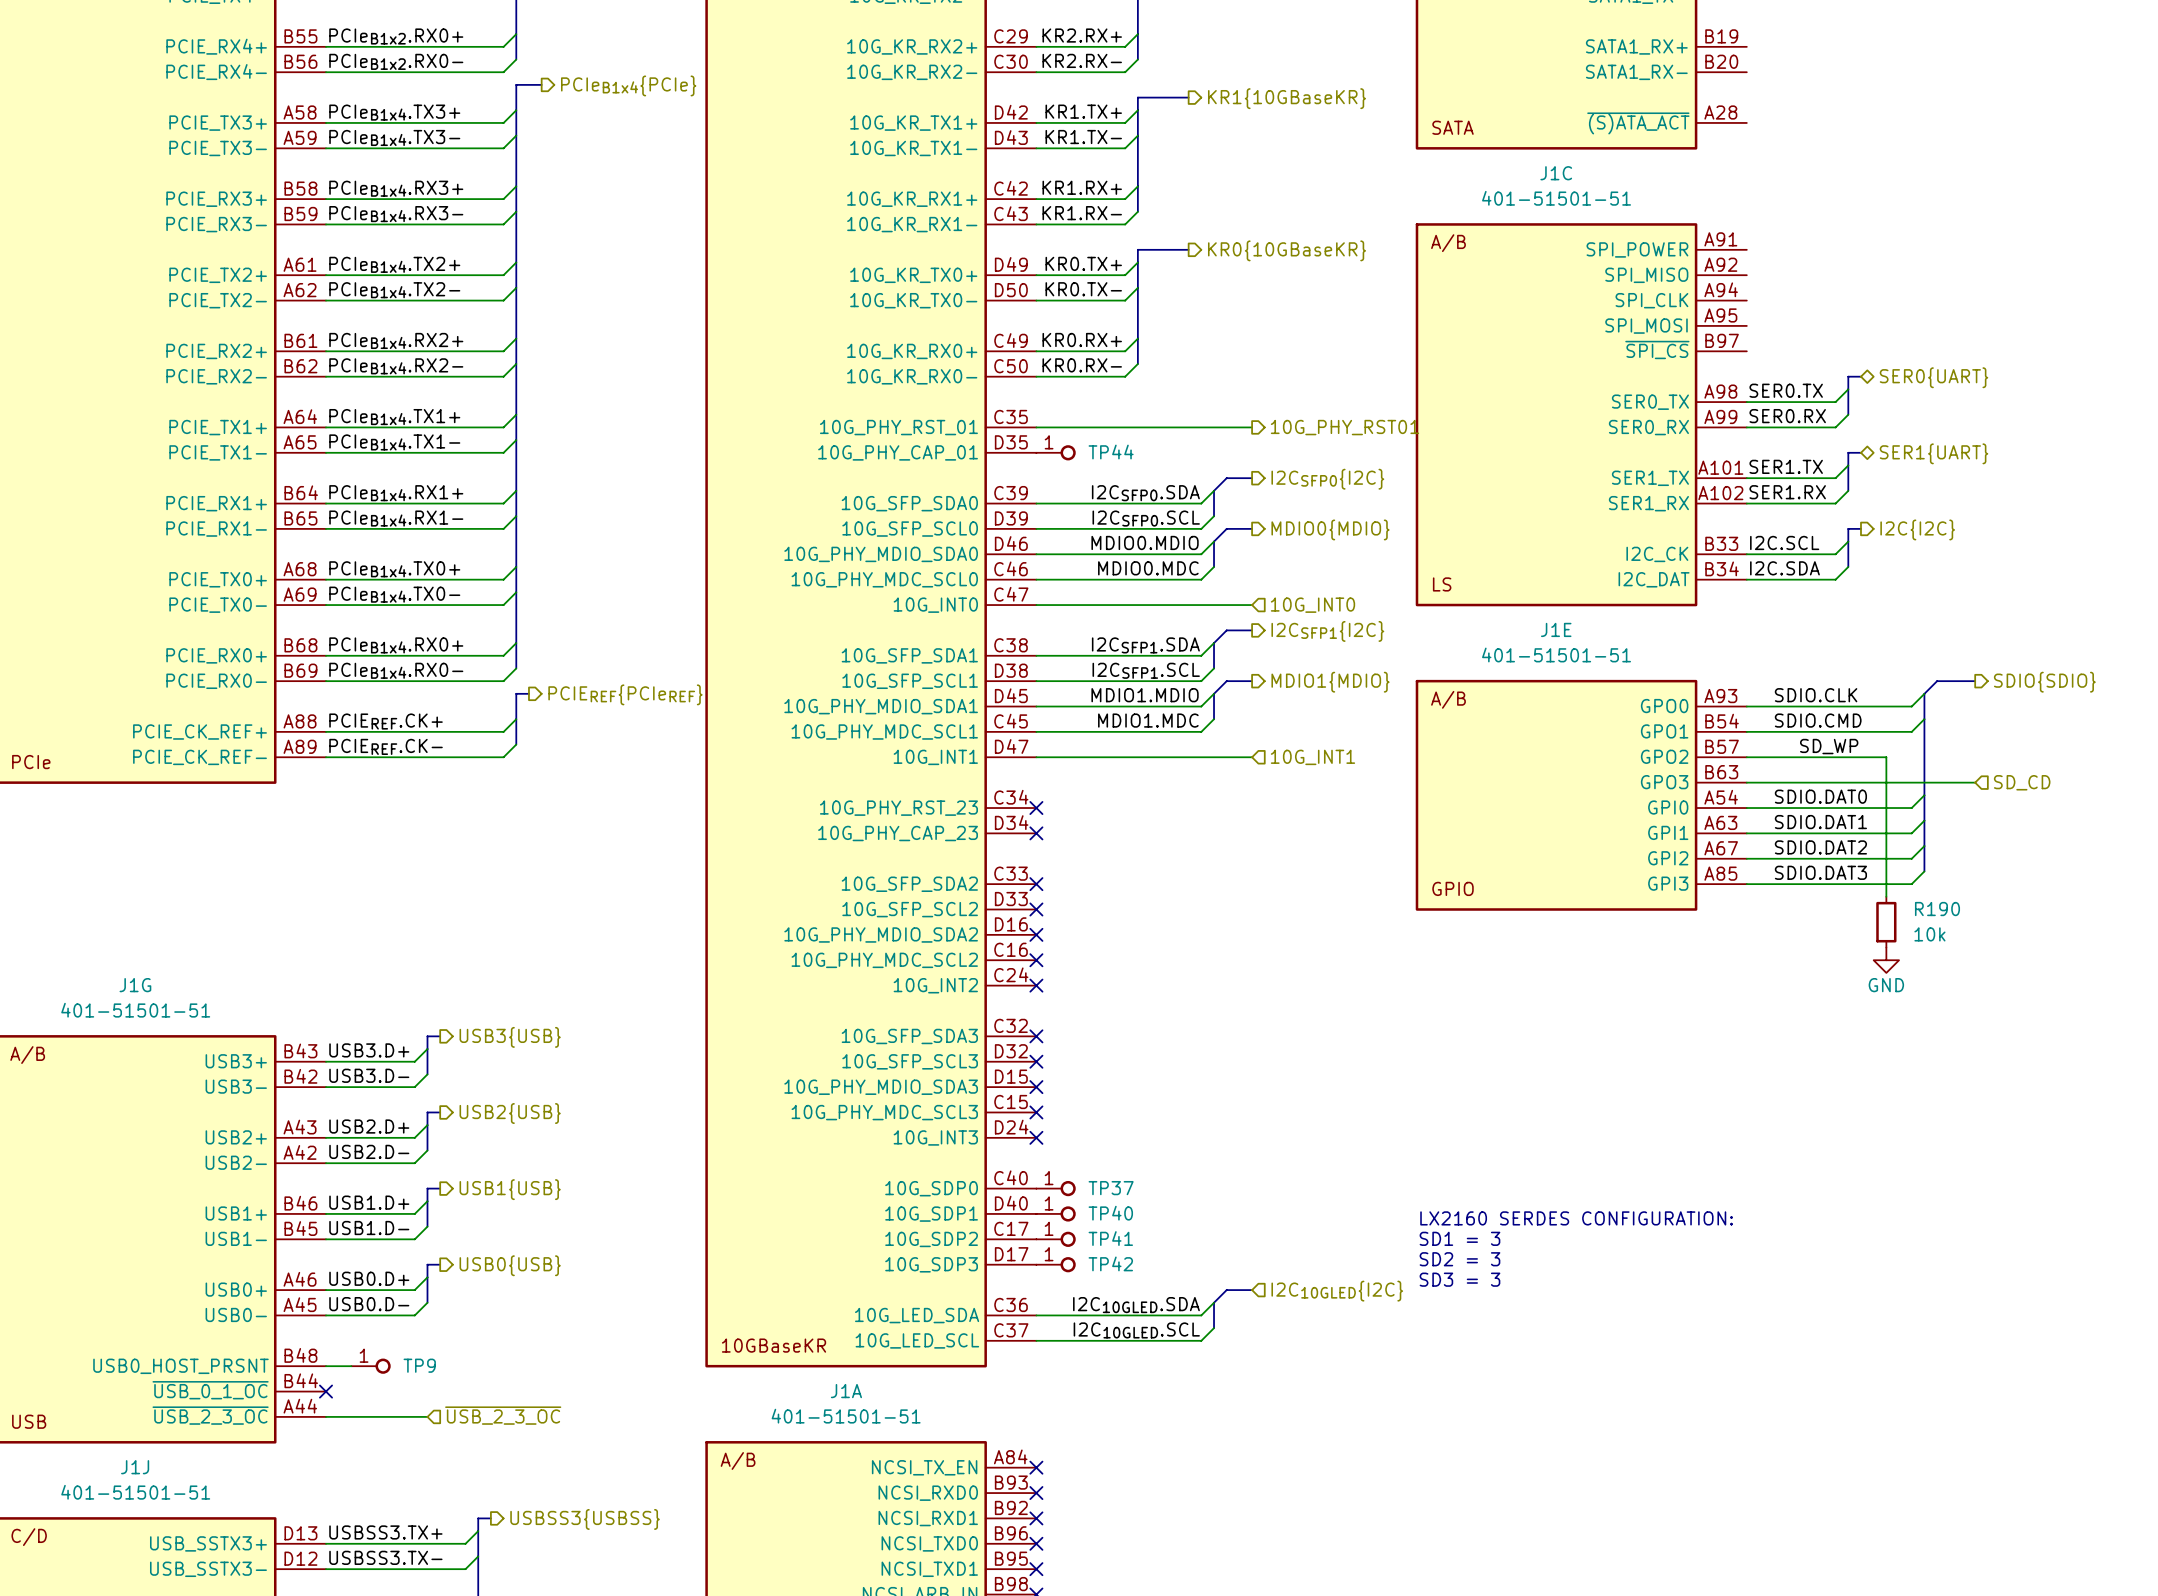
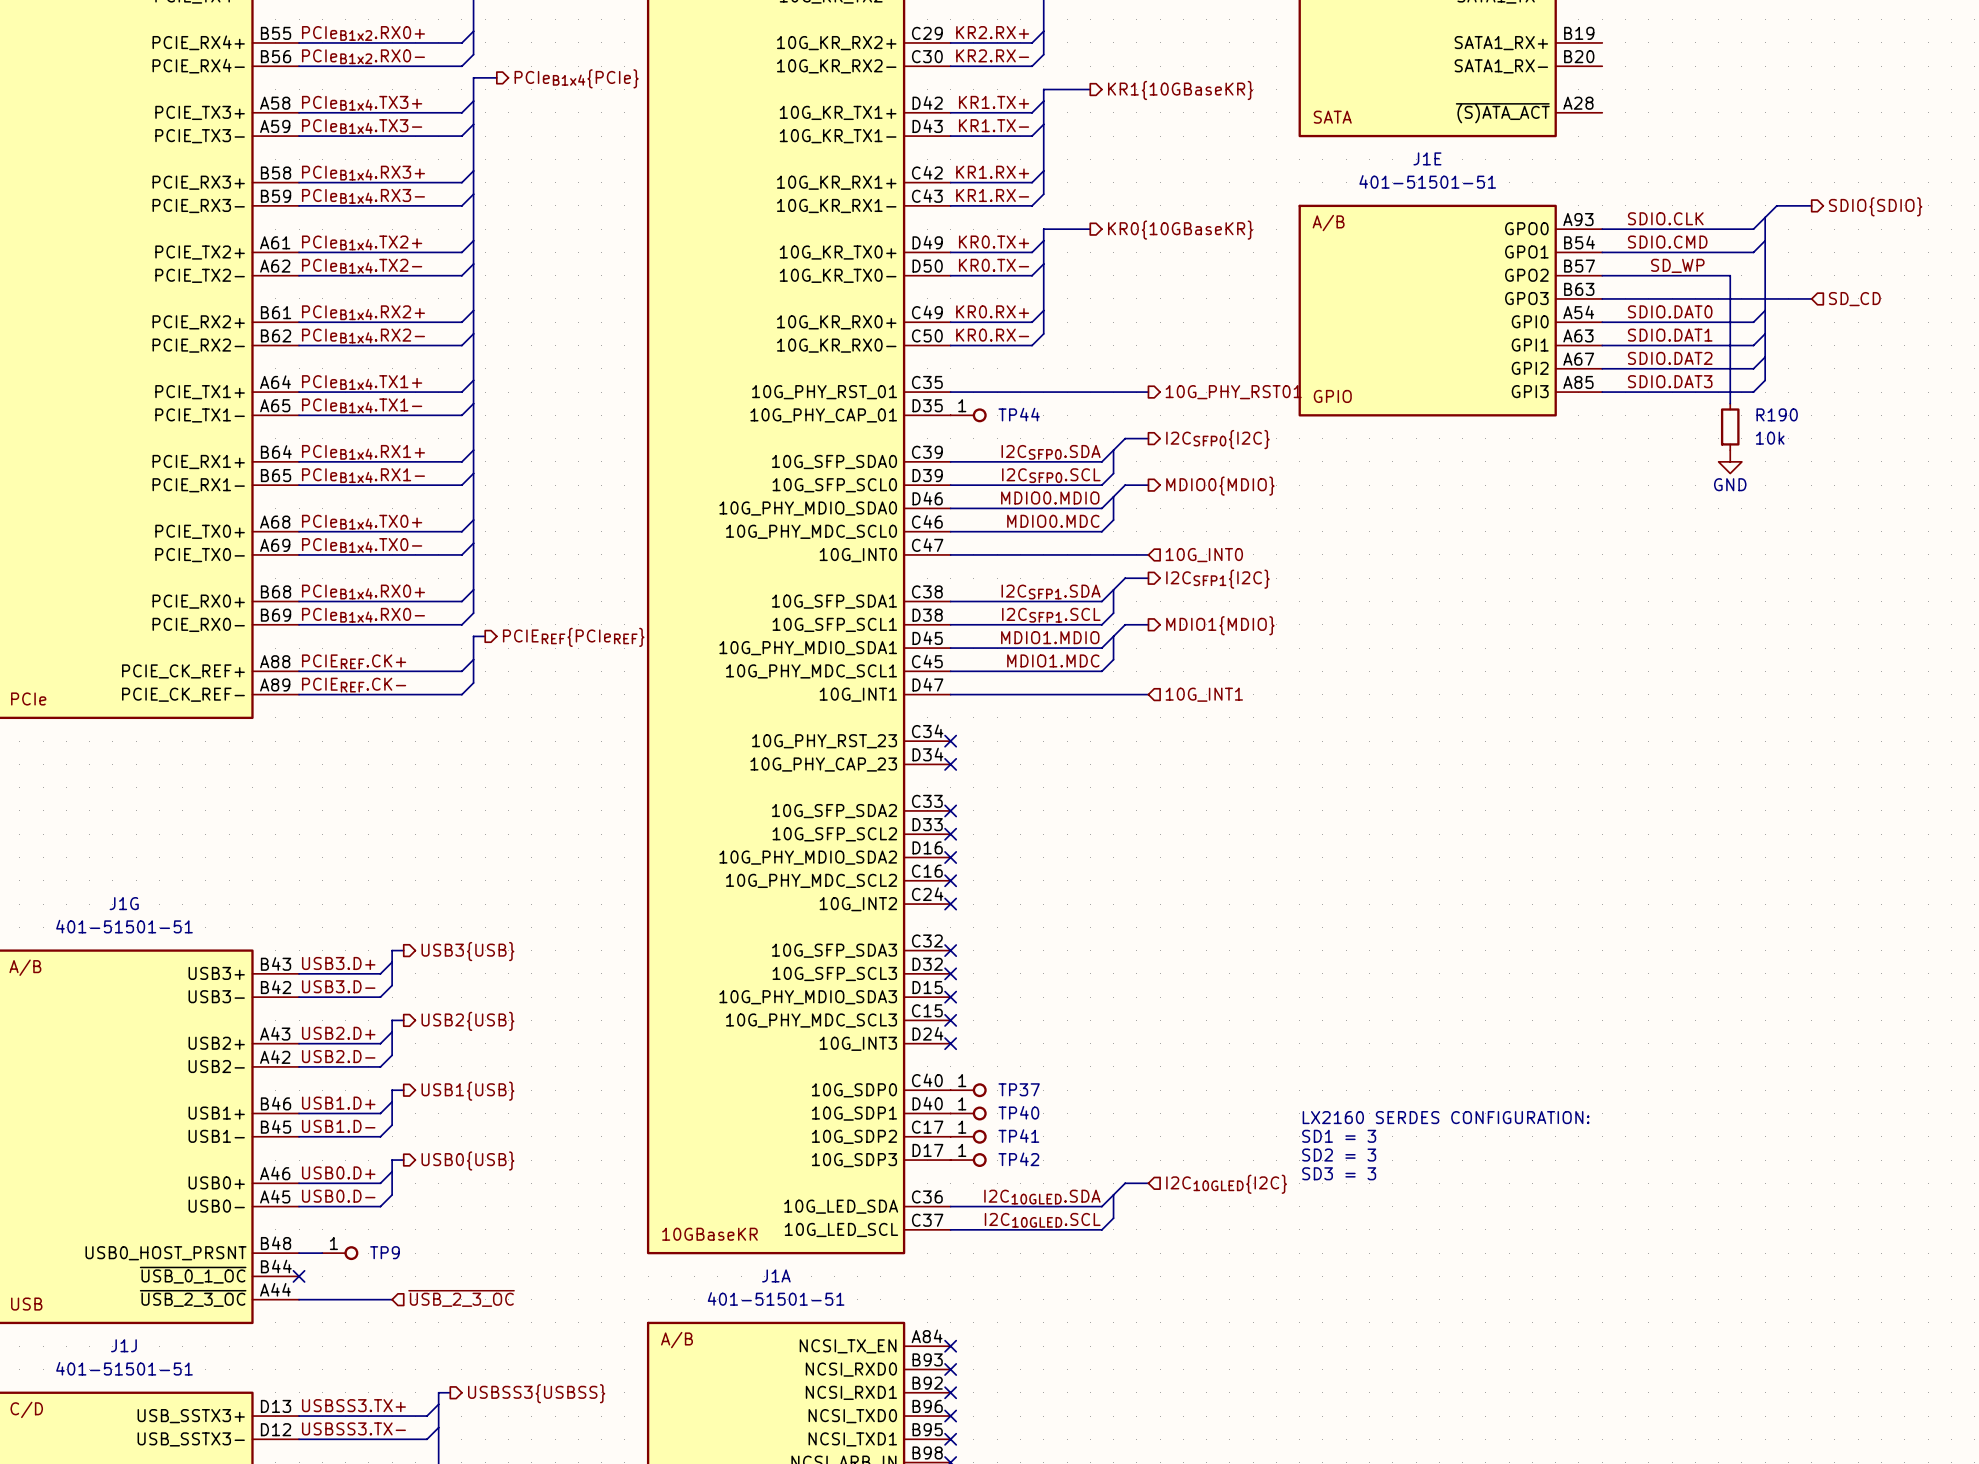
bus: none -> (1811, 205) (1776, 205) (1765, 217) (1765, 380)
hierarchical label: none -> SDIO{SDIO} (1875, 206)
wire: none -> (1765, 217) (1753, 229) (1602, 229)
label: none -> SDIO.CLK (1665, 218)
wire: none -> (1765, 240) (1753, 252) (1602, 252)
label: none -> SDIO.CMD (1667, 242)
label: none -> SD_WP (1677, 265)
wire: none -> (1602, 275) (1730, 275) (1730, 403)
wire: none -> (1602, 298) (1811, 298)
hierarchical label: none -> SD_CD (1854, 299)
wire: none -> (1765, 310) (1753, 322) (1602, 322)
label: none -> SDIO.DAT0 (1670, 311)
wire: none -> (1765, 333) (1753, 345) (1602, 345)
label: none -> SDIO.DAT1 (1670, 335)
bus: (1860, 376) (1848, 376) (1848, 414) -> none
hierarchical label: SER0{UART} (1933, 377) -> none
wire: (1848, 389) (1835, 402) -> (1765, 357) (1753, 368) (1683, 368)
label: SER0.TX (1786, 390) -> none
label: none -> SDIO.DAT2 (1670, 358)
J1C: (1581, 414) -> none
wire: (1848, 414) (1835, 427) -> (1765, 380) (1753, 392) (1683, 392)
label: SER0.RX (1787, 416) -> none
label: none -> SDIO.DAT3 (1670, 381)
bus: (1860, 452) (1848, 452) (1848, 490) -> none
hierarchical label: SER1{UART} (1933, 453) -> none
wire: (1848, 465) (1835, 478) (1746, 478) -> none
label: SER1.TX (1786, 466) -> none
wire: (1848, 490) (1835, 503) (1746, 503) -> none
label: SER1.RX (1787, 492) -> none
power symbol: none -> GND (1730, 461)
bus: (1860, 528) (1848, 528) (1848, 566) -> none
hierarchical label: I2C{I2C} (1917, 529) -> none
wire: (1848, 541) (1835, 554) (1746, 554) -> none
label: I2C.SCL (1784, 542) -> none
wire: (1848, 566) (1835, 579) (1746, 579) -> none
label: I2C.SDA (1784, 568) -> none
bus: (1975, 681) (1937, 681) (1924, 693) (1924, 871) -> none
hierarchical label: SDIO{SDIO} (2044, 682) -> none
wire: (1924, 693) (1911, 706) (1746, 706) -> none
label: SDIO.CLK (1816, 695) -> none
wire: (1924, 719) (1911, 731) (1746, 731) -> none
label: SDIO.CMD (1818, 720) -> none
label: SD_WP (1829, 746) -> none
wire: (1746, 757) (1886, 757) (1886, 896) -> none
wire: (1746, 782) (1975, 782) -> none
hierarchical label: SD_CD (2022, 782) -> none
J1E position: (1581, 795) -> (1450, 310)
wire: (1924, 795) (1911, 808) (1746, 808) -> none
label: SDIO.DAT0 (1820, 796) -> none
wire: (1924, 820) (1911, 833) (1746, 833) -> none
label: SDIO.DAT1 (1820, 822) -> none
wire: (1924, 846) (1911, 858) (1746, 858) -> none
label: SDIO.DAT2 (1820, 847) -> none
wire: (1924, 871) (1911, 884) (1746, 884) -> none
label: SDIO.DAT3 (1820, 872) -> none
R190 position: (1886, 922) -> (1730, 426)
power symbol: GND (1886, 960) -> none

